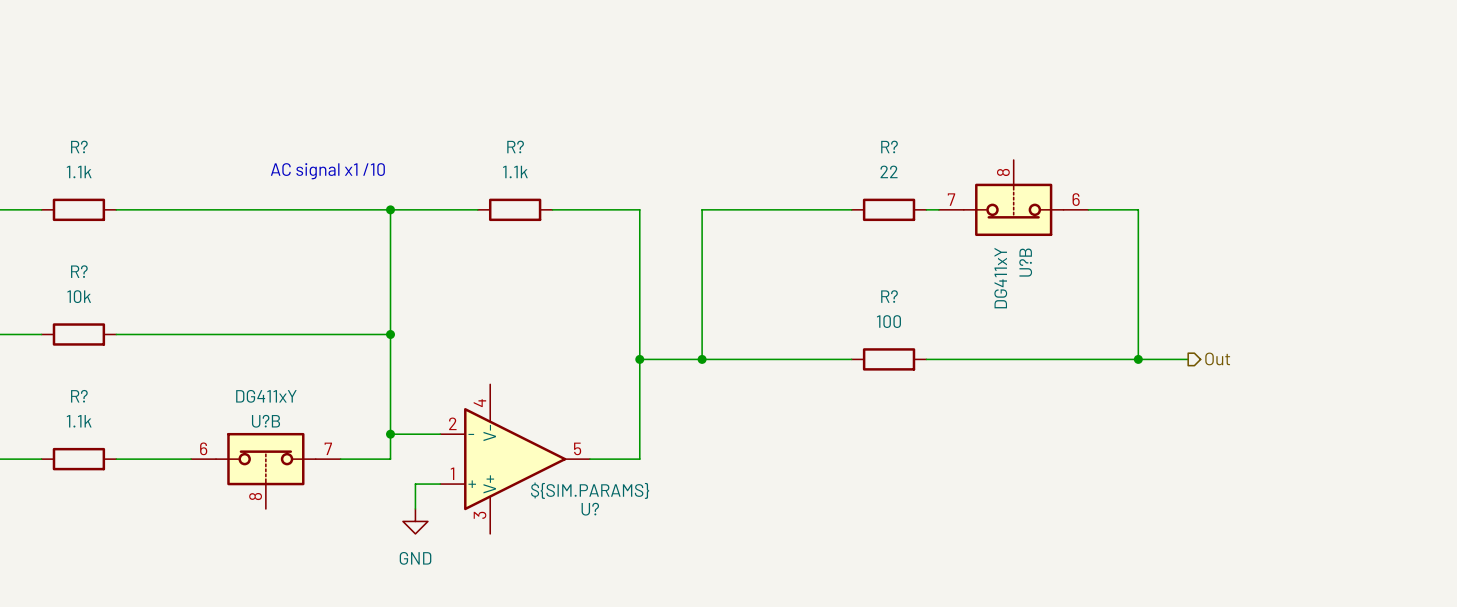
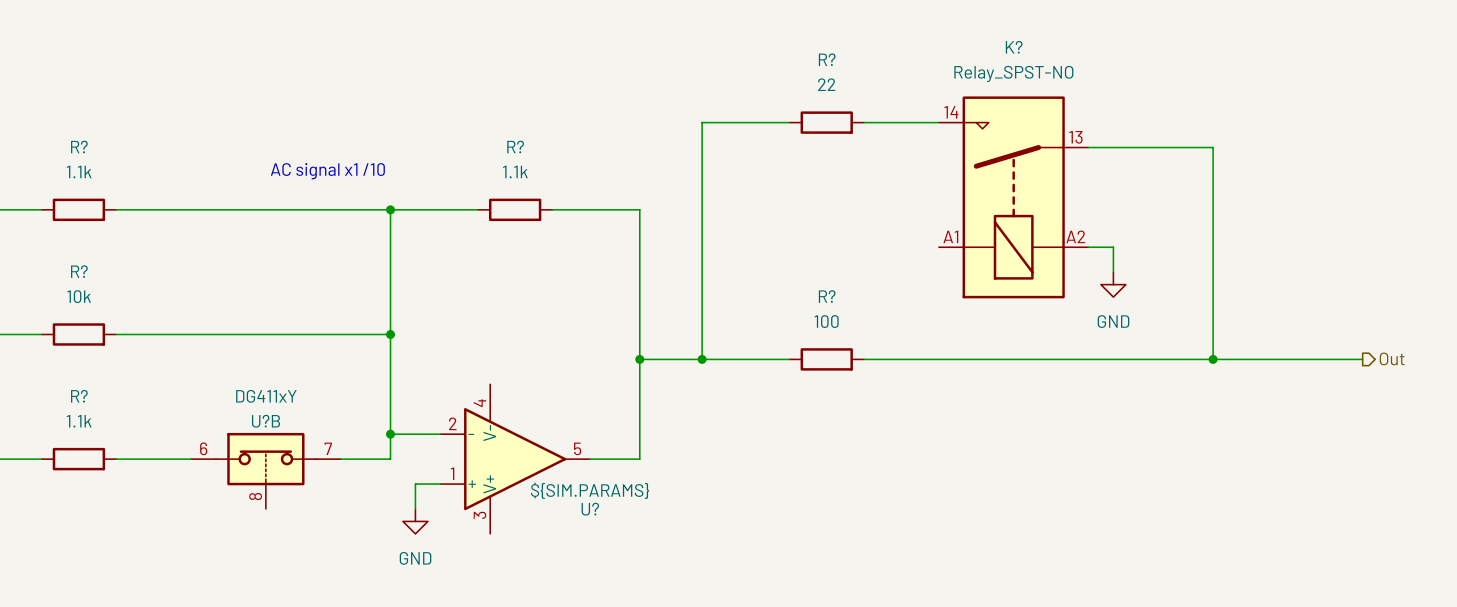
wire: none -> (864, 122) (938, 122)
wire: none -> (1088, 147) (1213, 147) (1213, 359)
K?: none -> Relay_SPST-NO (1013, 197)
U?B: DG411xY (1013, 198) -> none
wire: (702, 209) (851, 209) -> (702, 209) (702, 122) (789, 122)
R? position: (889, 209) -> (826, 122)
wire: (926, 209) (938, 209) -> none
wire: (1088, 209) (1138, 209) (1138, 359) -> none
wire: none -> (1088, 247) (1113, 247) (1113, 272)
power symbol: none -> GND (1113, 284)
hierarchical label position: Out (1217, 358) -> Out (1392, 358)
wire: (789, 359) (851, 359) -> (864, 359) (926, 359)
R? position: (889, 359) -> (826, 359)
junction: (1138, 359) -> none
wire: none -> (1188, 359) (1362, 359)
junction: none -> (1213, 359)

